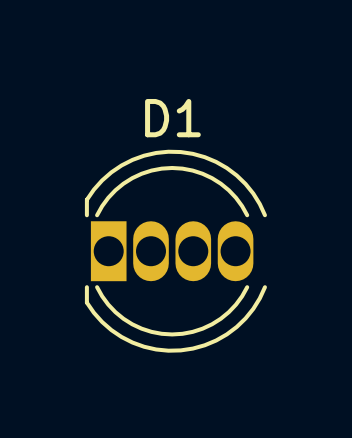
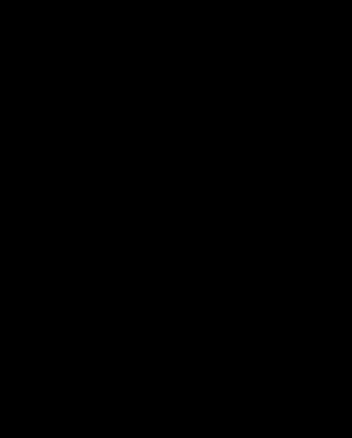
D1: (175, 251) -> none

